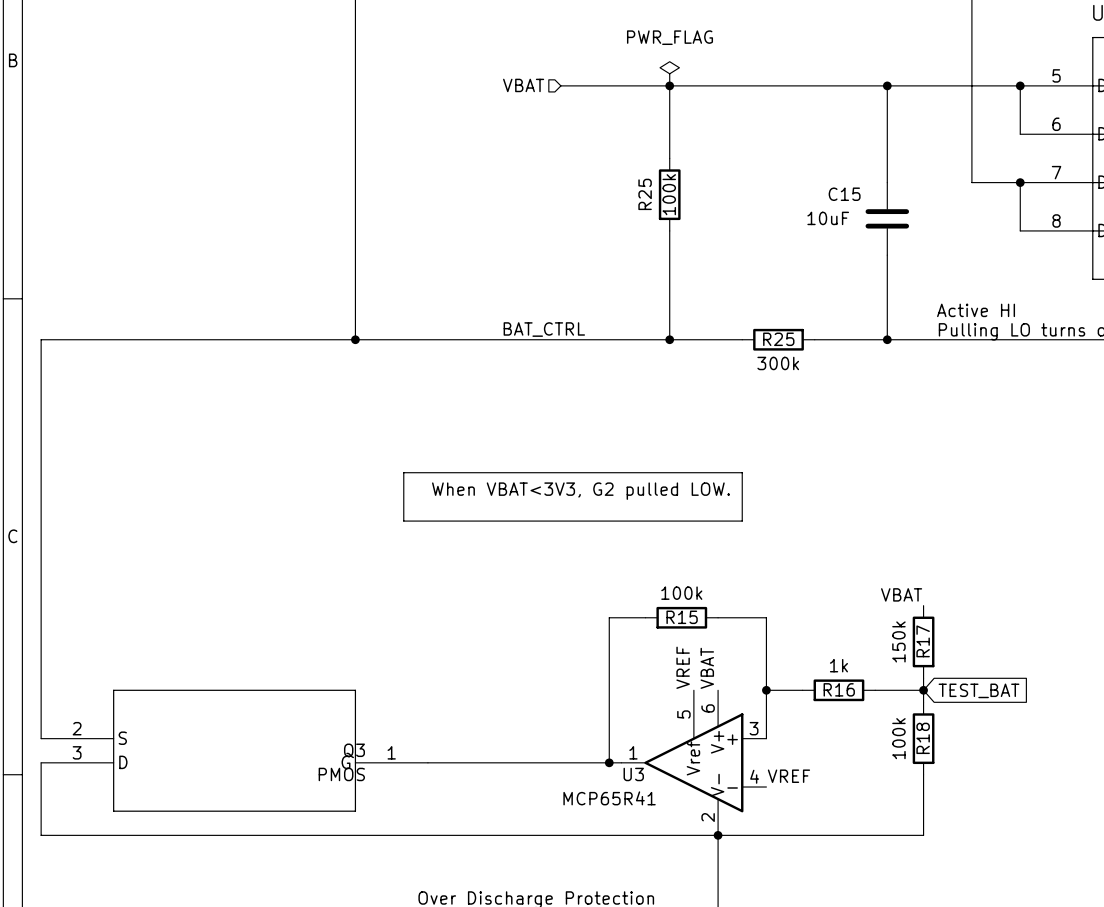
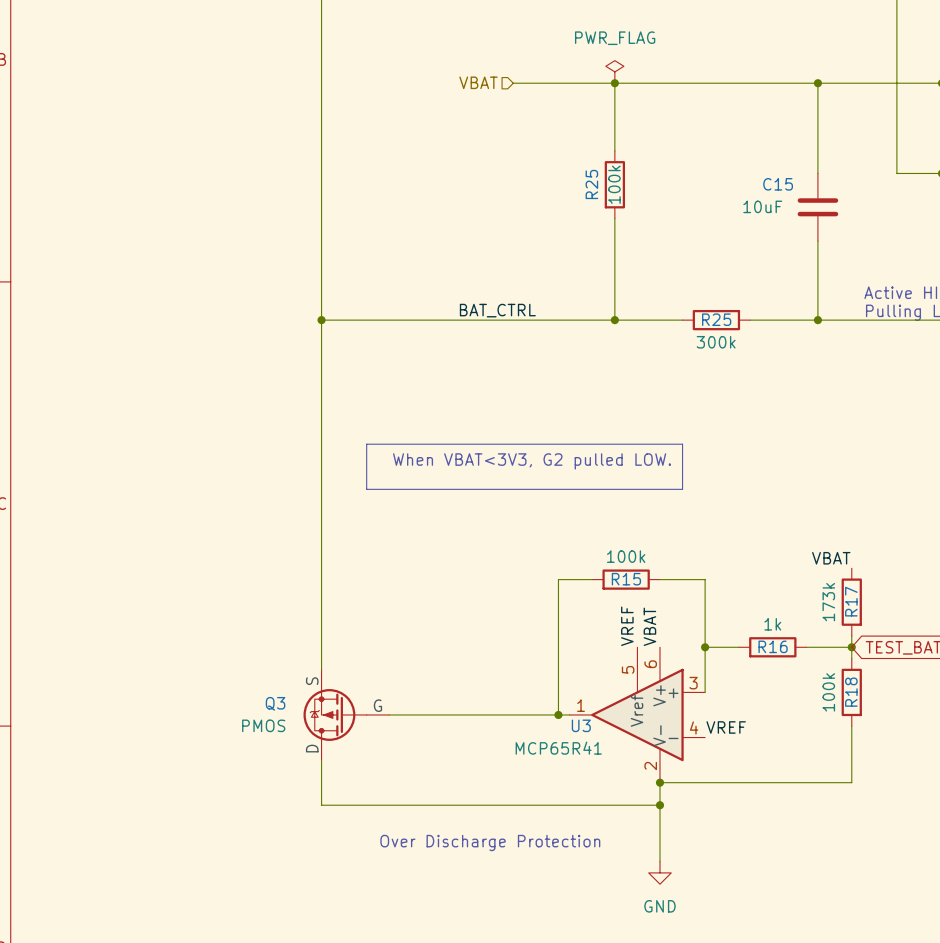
wire: (355, 339) (41, 339) (41, 738) -> (321, 320) (321, 669)
R17 value: 150k (898, 641) -> 173k (828, 602)
Q3 symbol: [41, 689, 428, 812] -> [303, 669, 390, 761]
Q3 name position: Q3 (354, 750) -> Q3 (275, 703)
wire: (41, 762) (41, 835) (718, 835) -> none
Q3 value position: PMOS (341, 774) -> PMOS (263, 725)
wire: none -> (321, 760) (321, 805) (659, 805)
junction: none -> (659, 805)

